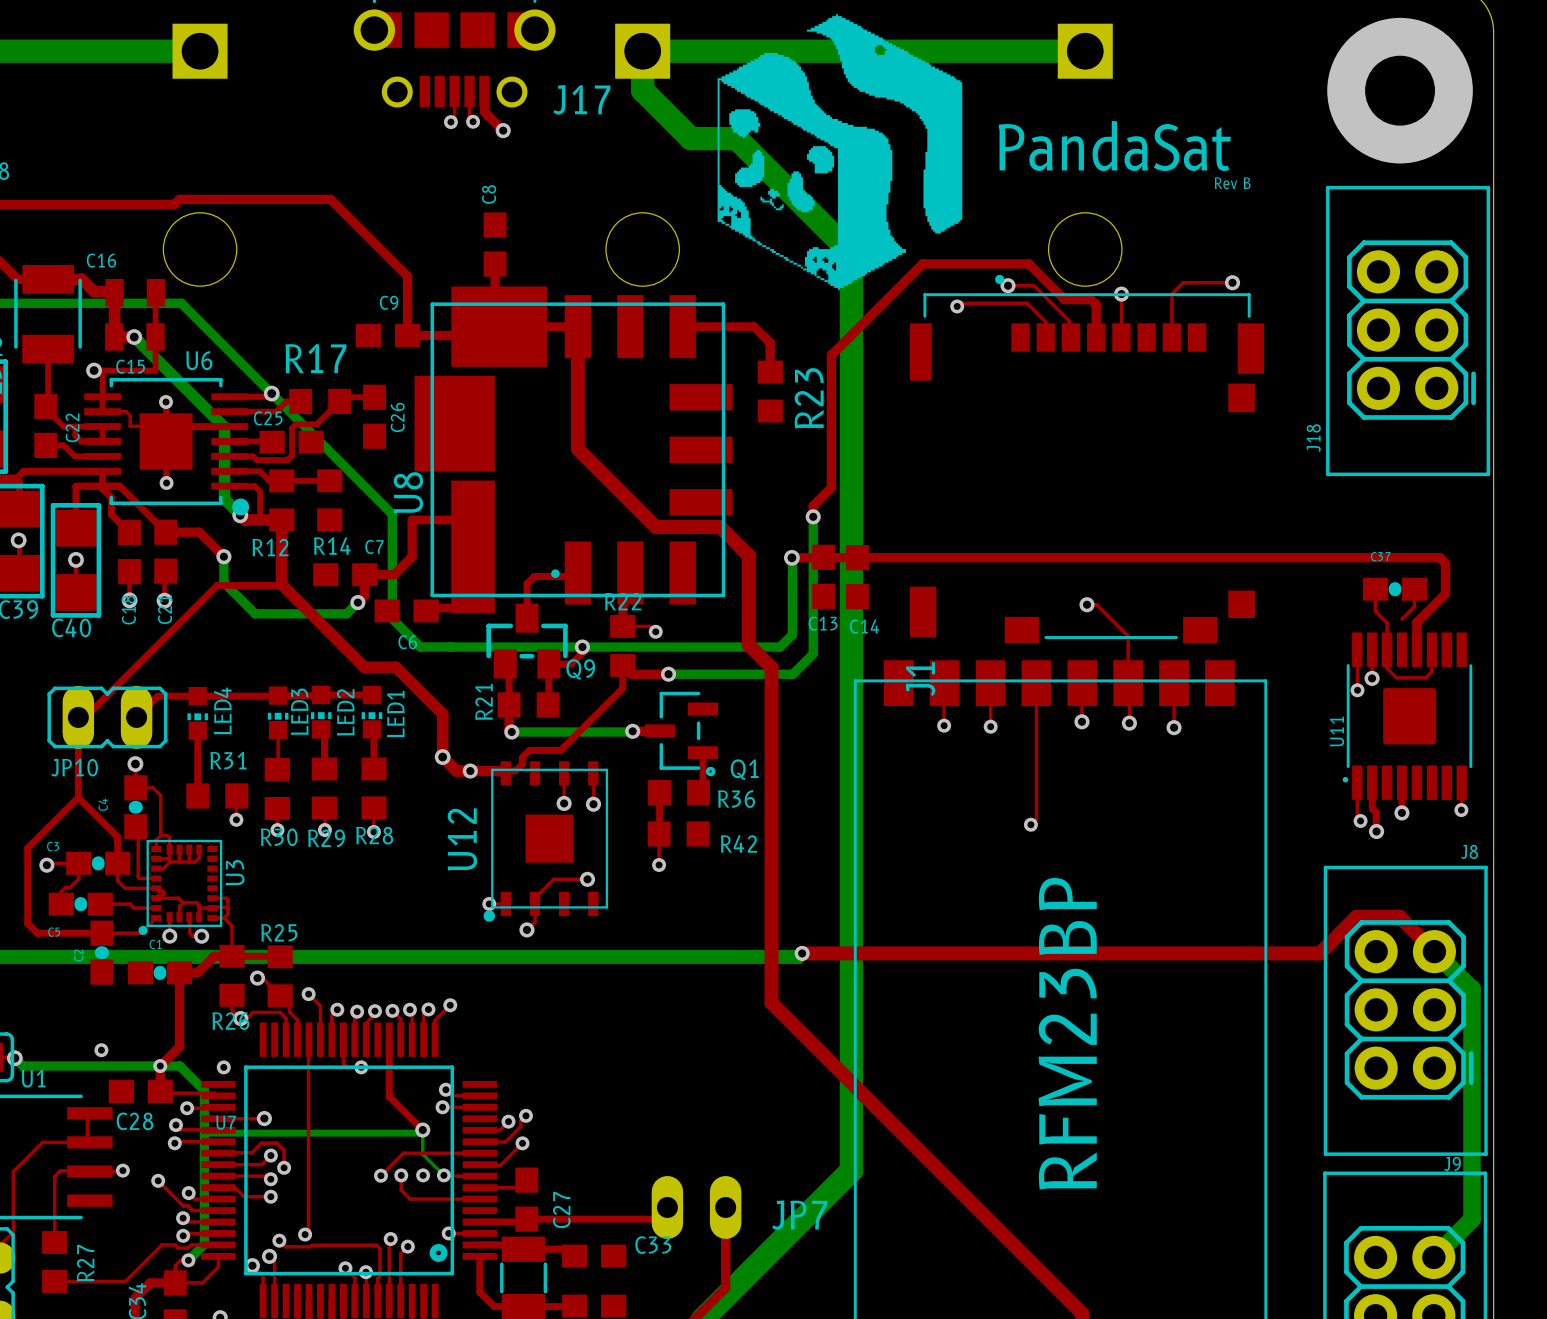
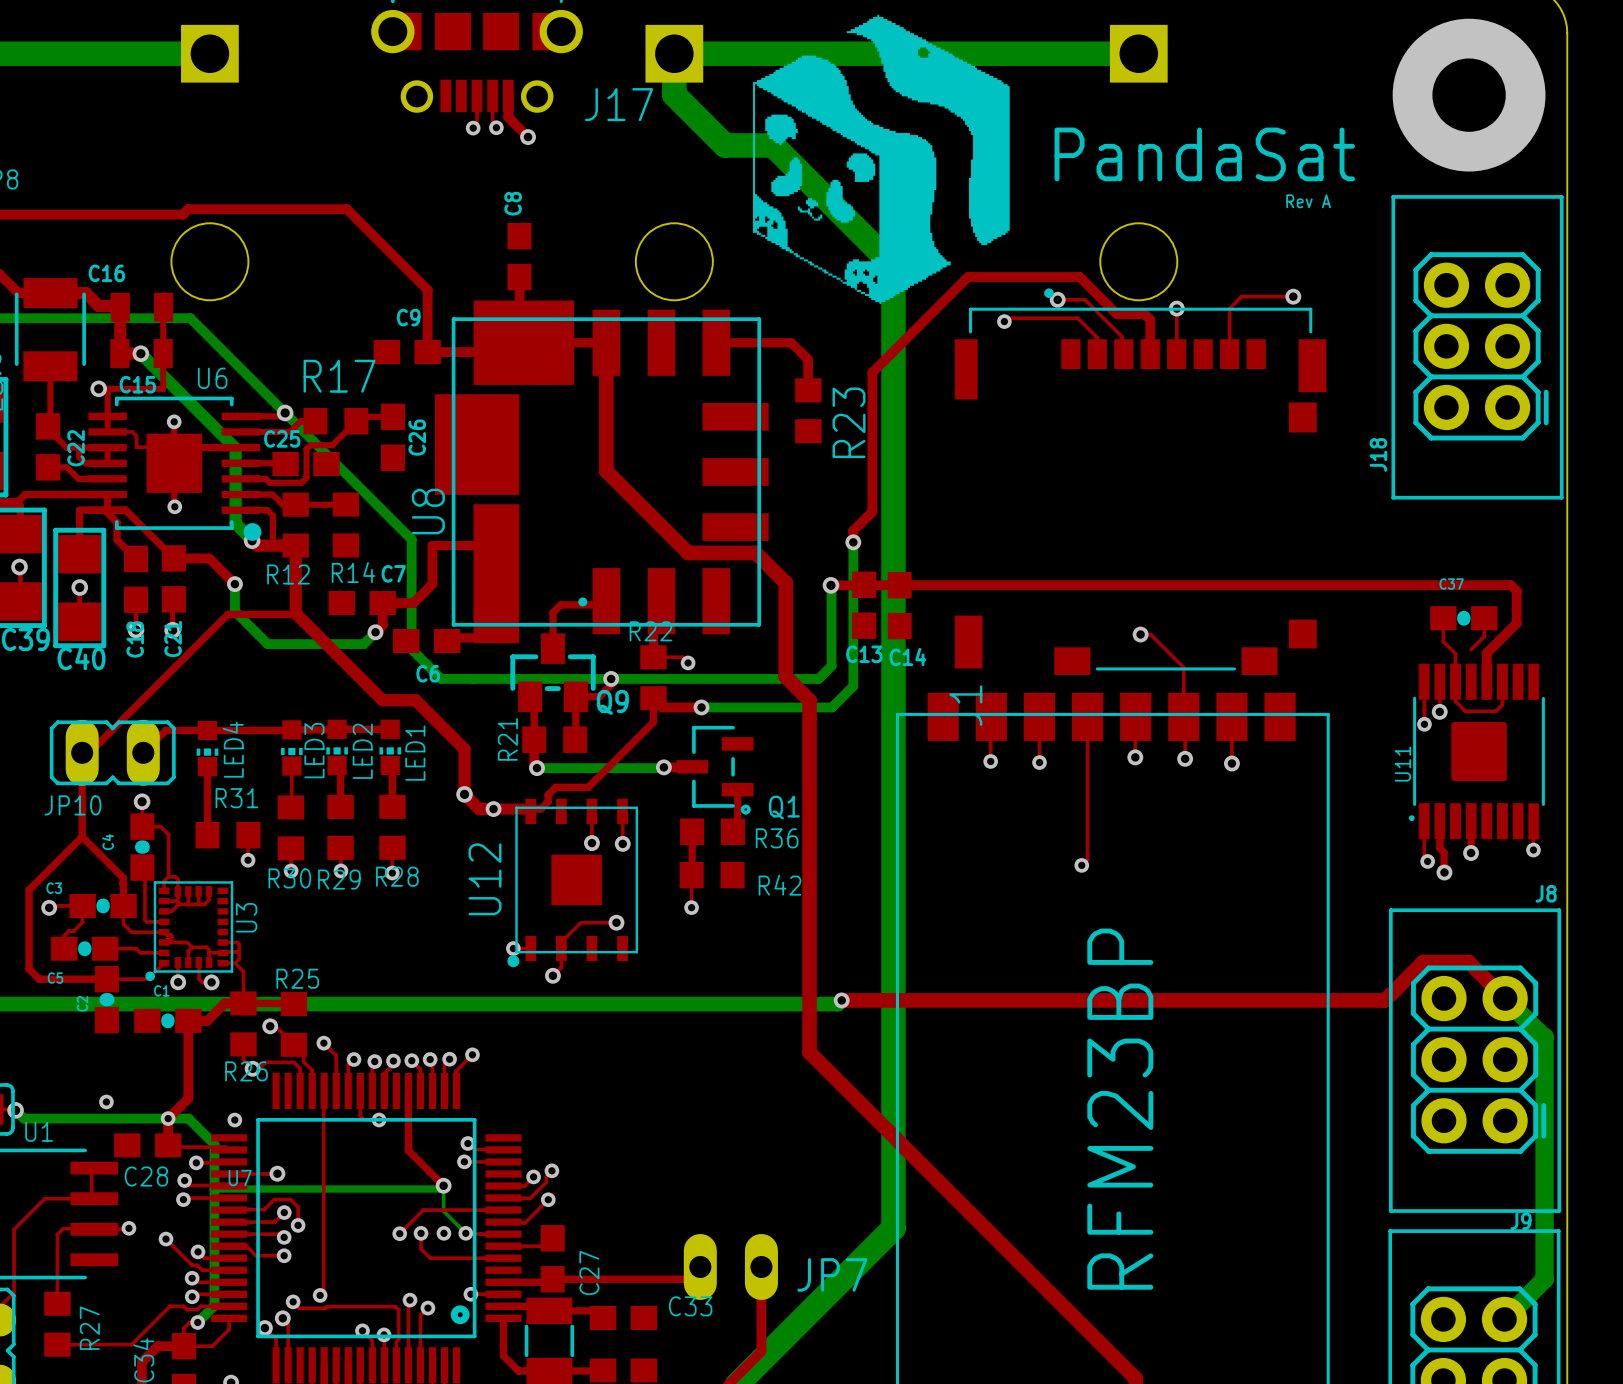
text: Rev B (1232, 183) -> Rev A (1308, 201)

